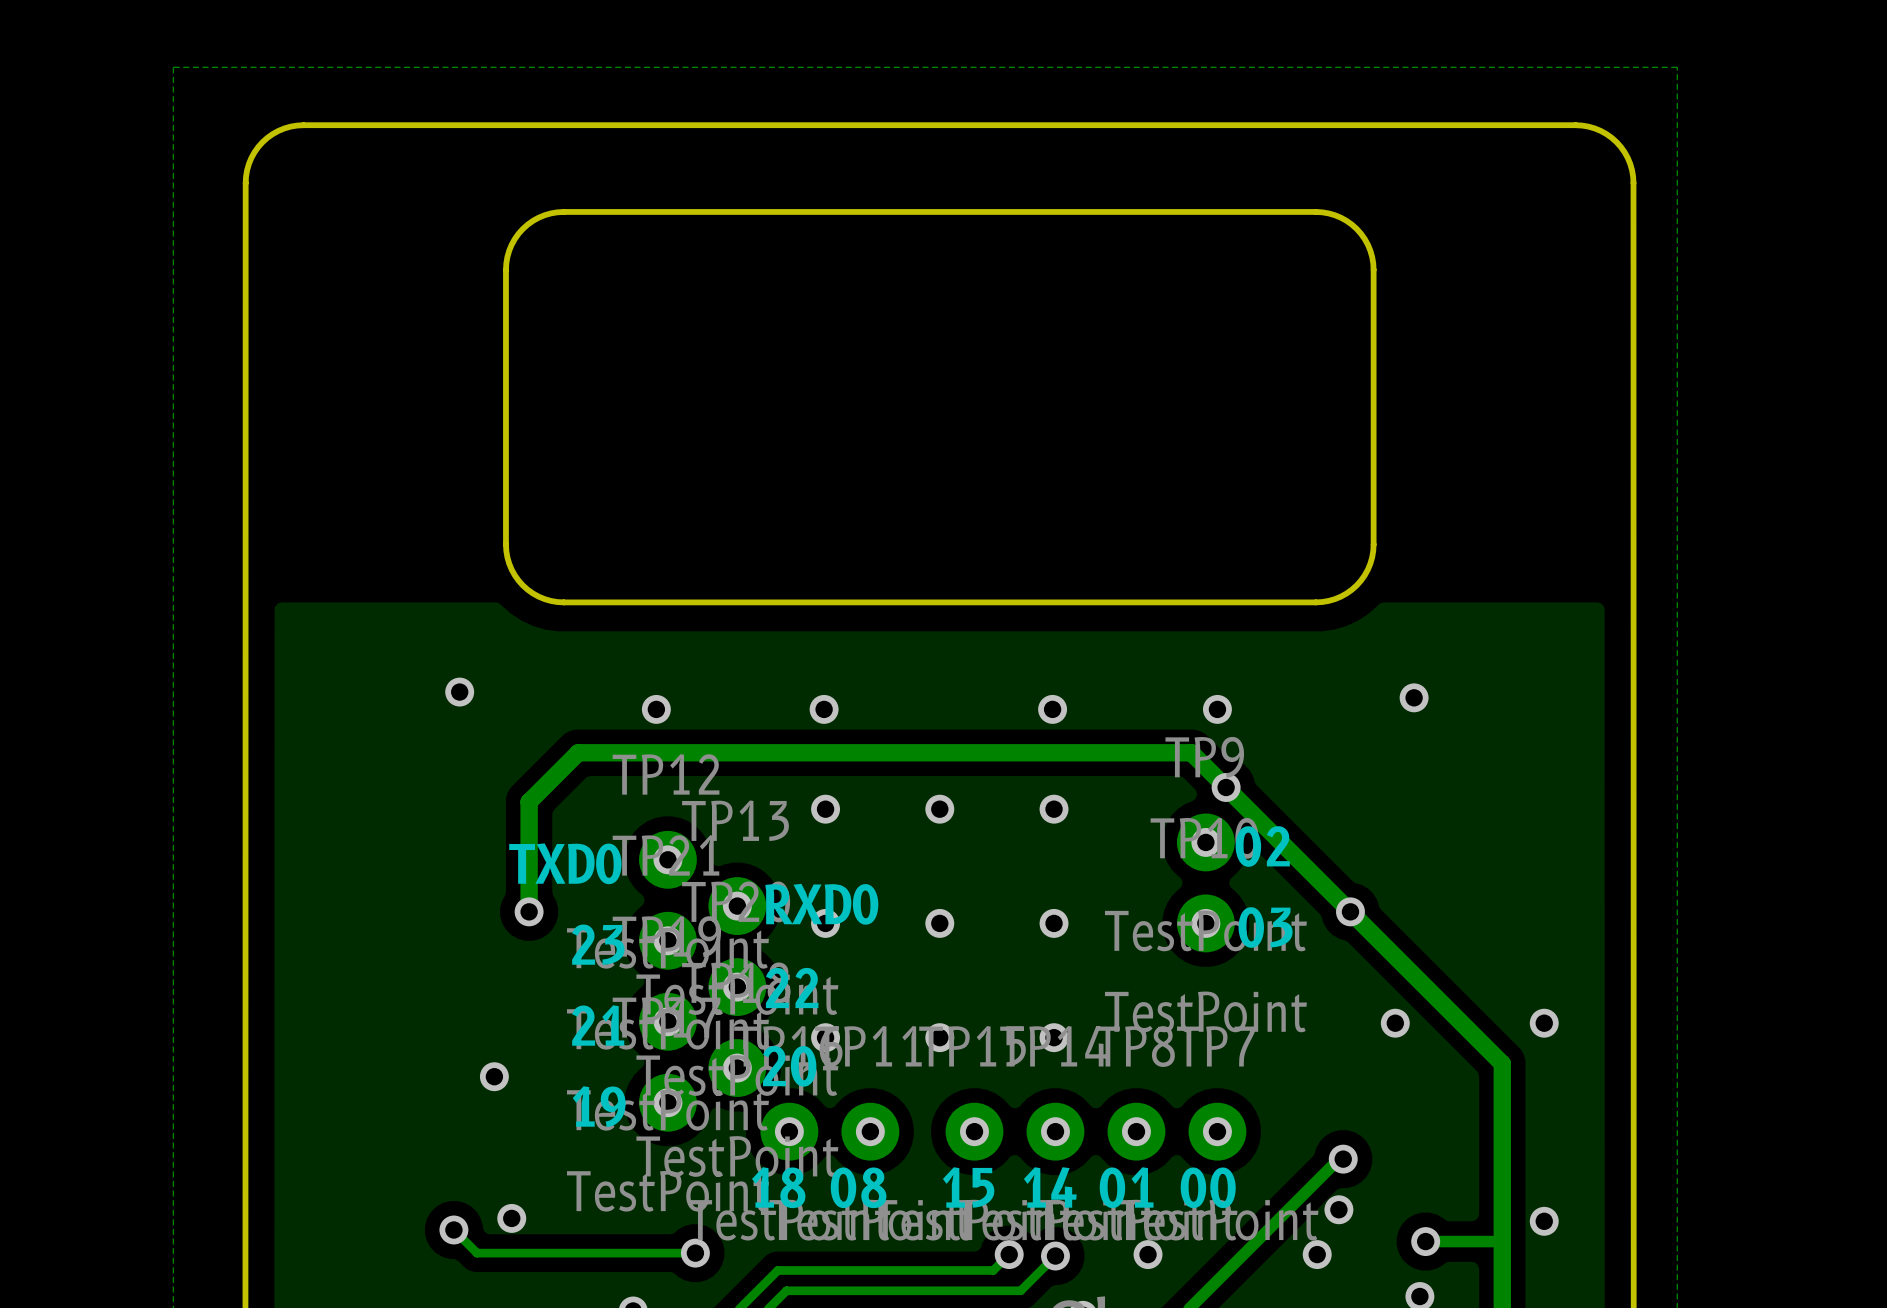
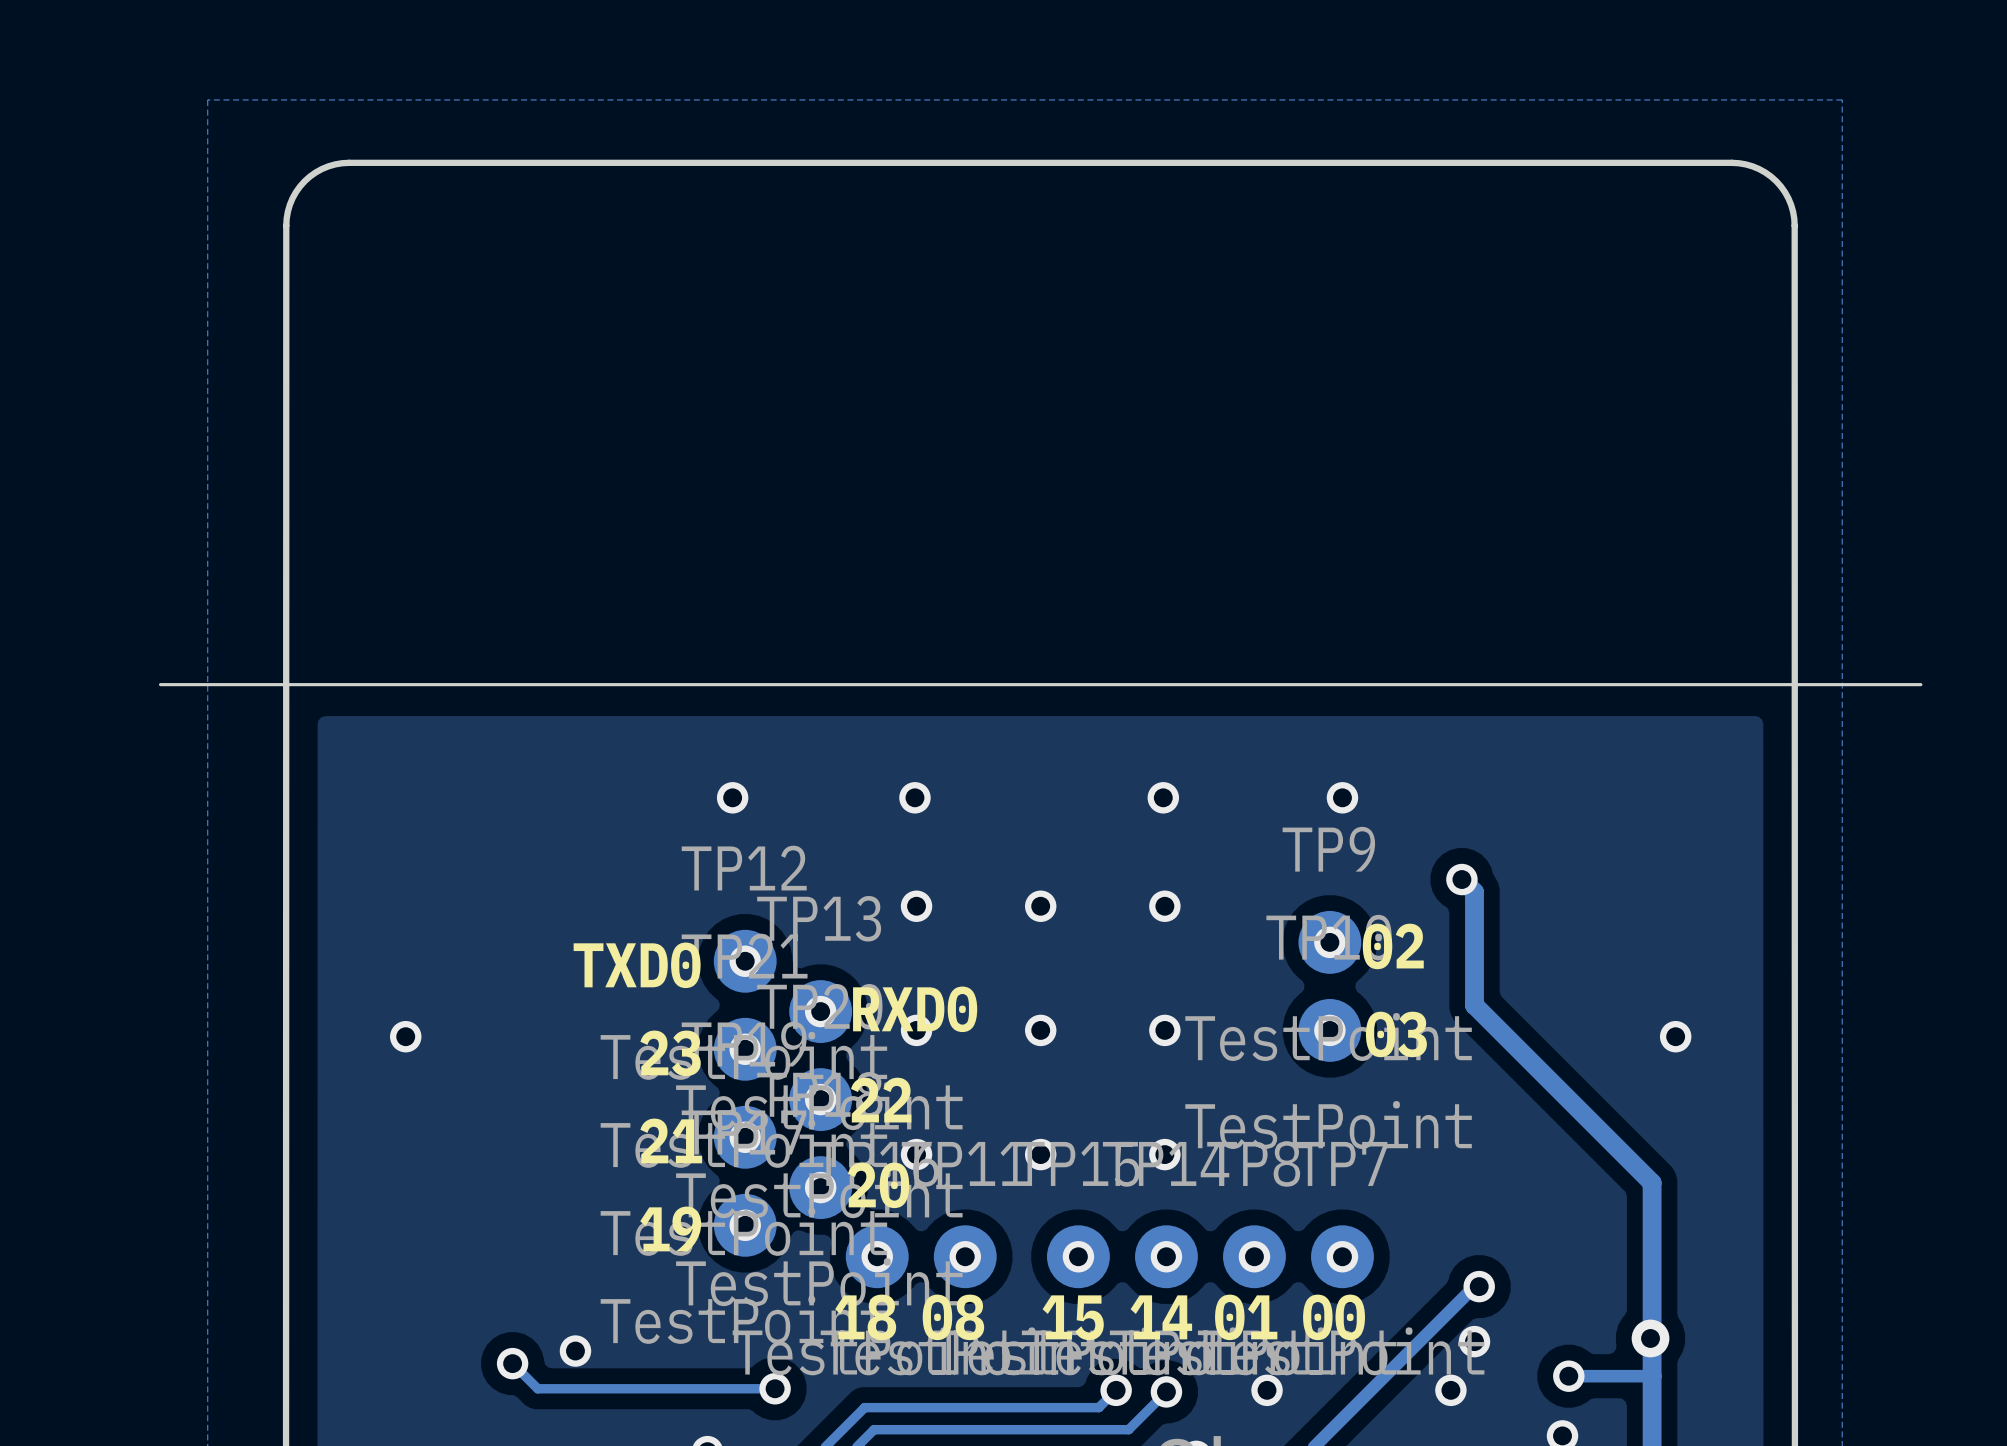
board edge: (1315, 211) (563, 211) (538, 217) (518, 233) (509, 250) (506, 263) (505, 544) (511, 569) (518, 580) (533, 593) (550, 600) (563, 602) (1315, 602) (1340, 596) (1356, 585) (1364, 575) (1373, 551) (1373, 263) (1367, 244) (1351, 224) (1334, 215) (1315, 211) -> none
board edge: none -> (1920, 684) (160, 684)
via: (459, 692) -> none
via: (1414, 697) -> none
via: none -> (1461, 879)
via: (1226, 787) -> none
track: (1338, 900) (1191, 752) (578, 752) (529, 801) (529, 911) -> (1474, 1005) (1474, 892) (1461, 879)
via: (529, 911) -> none
via: (1350, 911) -> none
via: none -> (405, 1036)
via: none -> (1675, 1036)
via: (1395, 1023) -> none
via: (1544, 1023) -> none
via: (494, 1076) -> none
via: none -> (1650, 1338)
via: (1544, 1221) -> none

